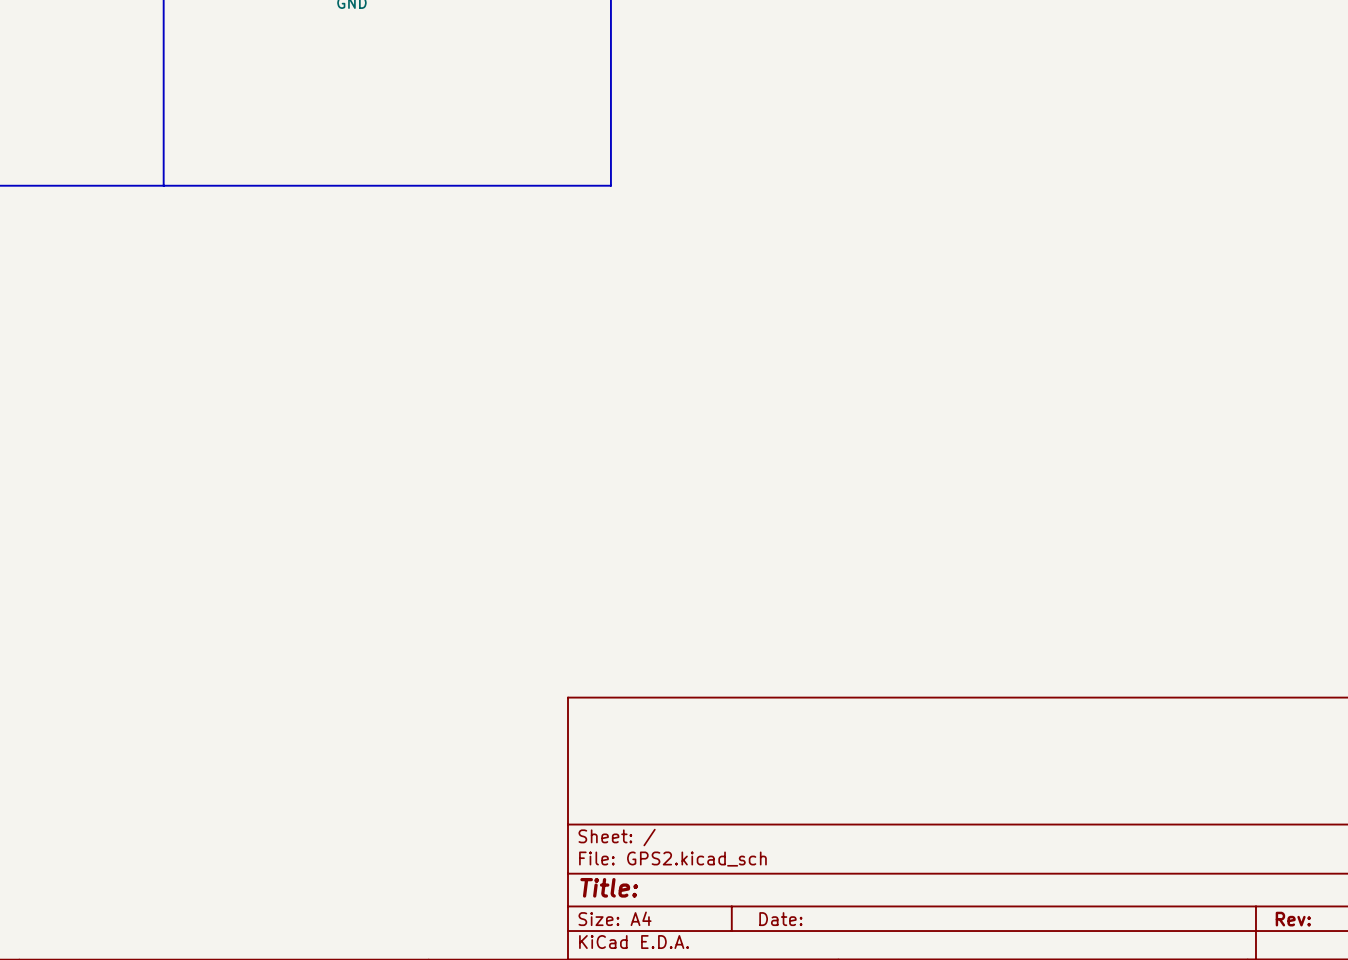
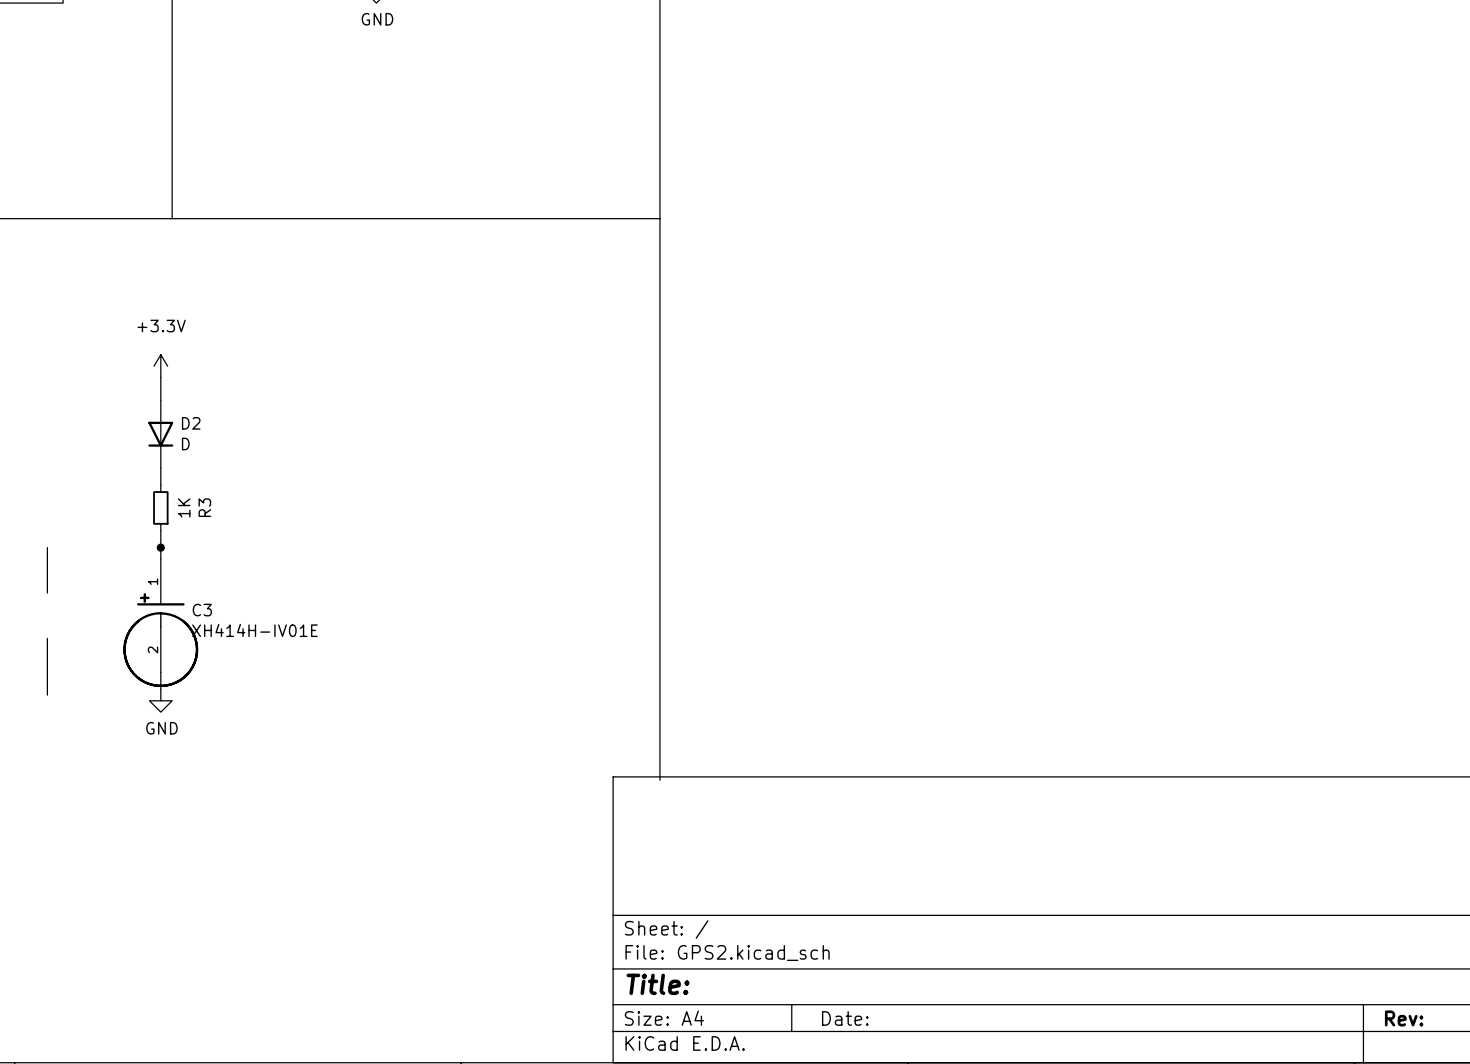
line: none -> (659, 218) (659, 780)
power symbol: none -> +3.3V (160, 366)
wire: none -> (160, 377) (160, 400)
D2: none -> D (160, 434)
wire: none -> (160, 468) (160, 485)
R3: none -> 1K (160, 507)
wire: none -> (160, 530) (160, 558)
wire: none -> (47, 547) (47, 593)
junction: none -> (160, 547)
C3: none -> XH414H-IV01E (160, 623)
wire: none -> (47, 638) (47, 695)
wire: none -> (160, 672) (160, 689)
power symbol: none -> GND (160, 700)

